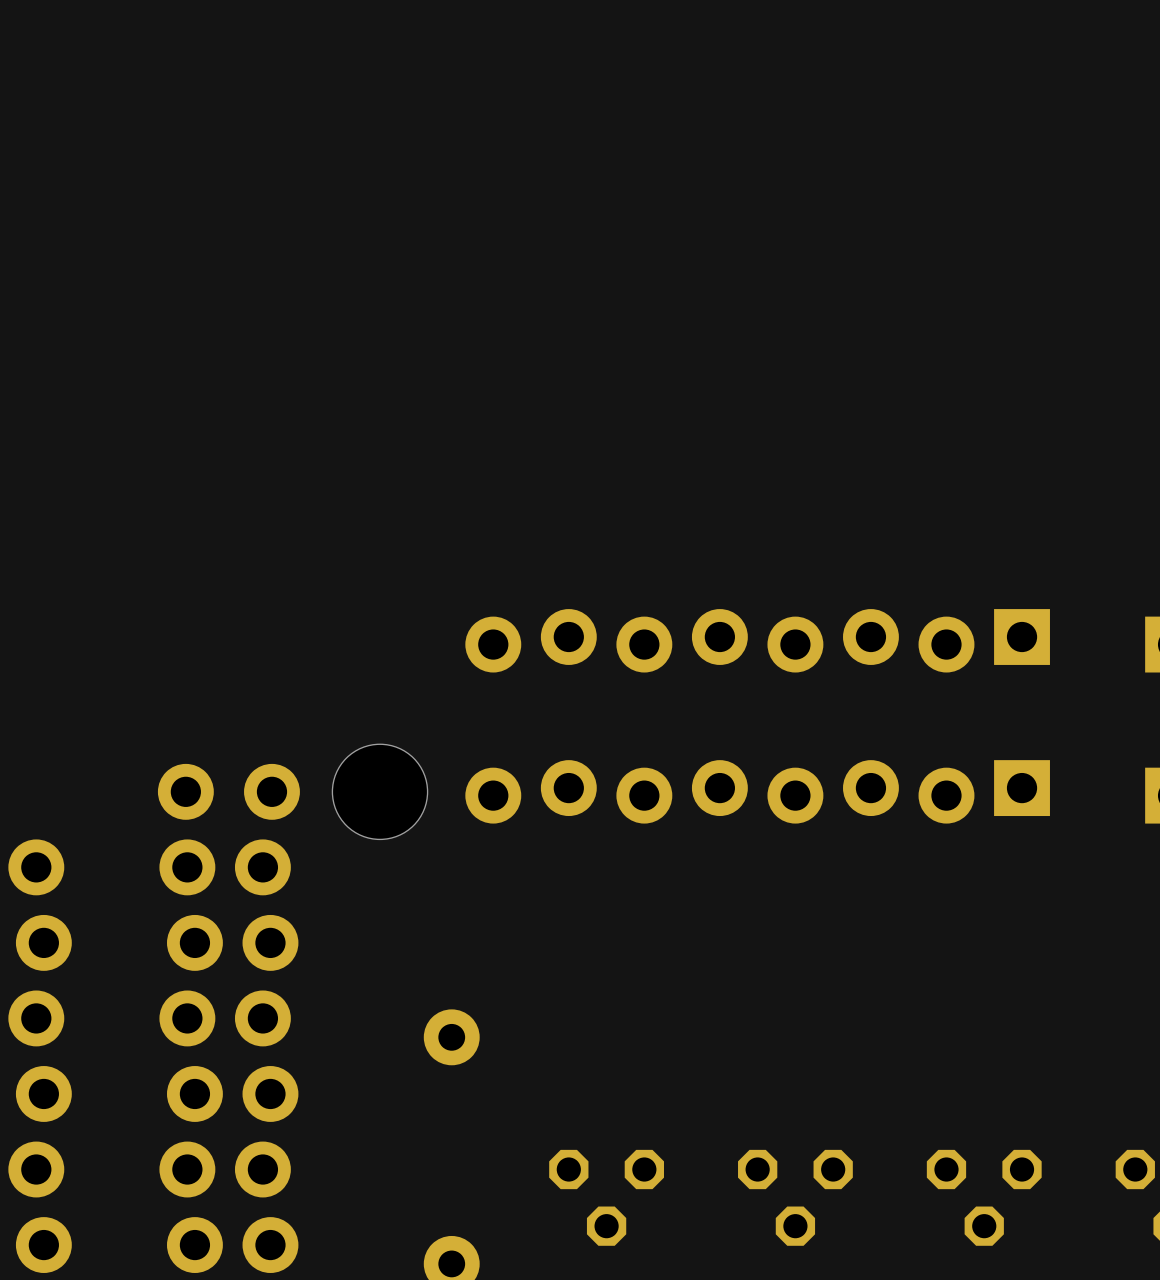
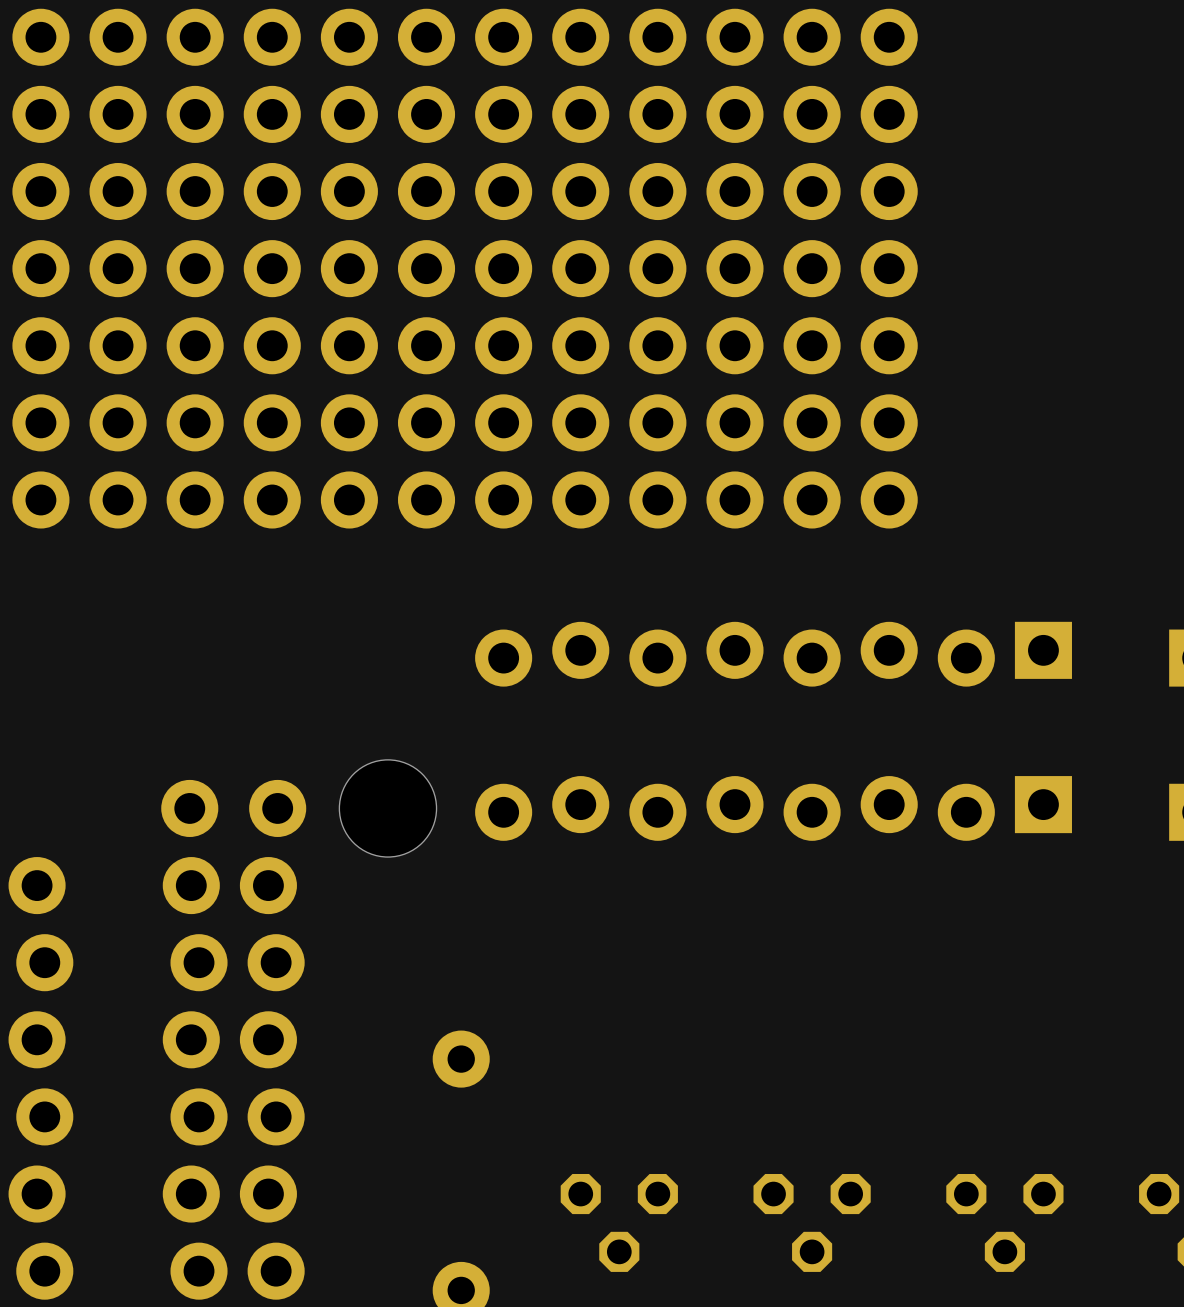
part: none -> (465, 37)
part: none -> (465, 114)
part: none -> (465, 191)
part: none -> (465, 268)
part: none -> (465, 345)
part: none -> (465, 422)
part: none -> (465, 499)

